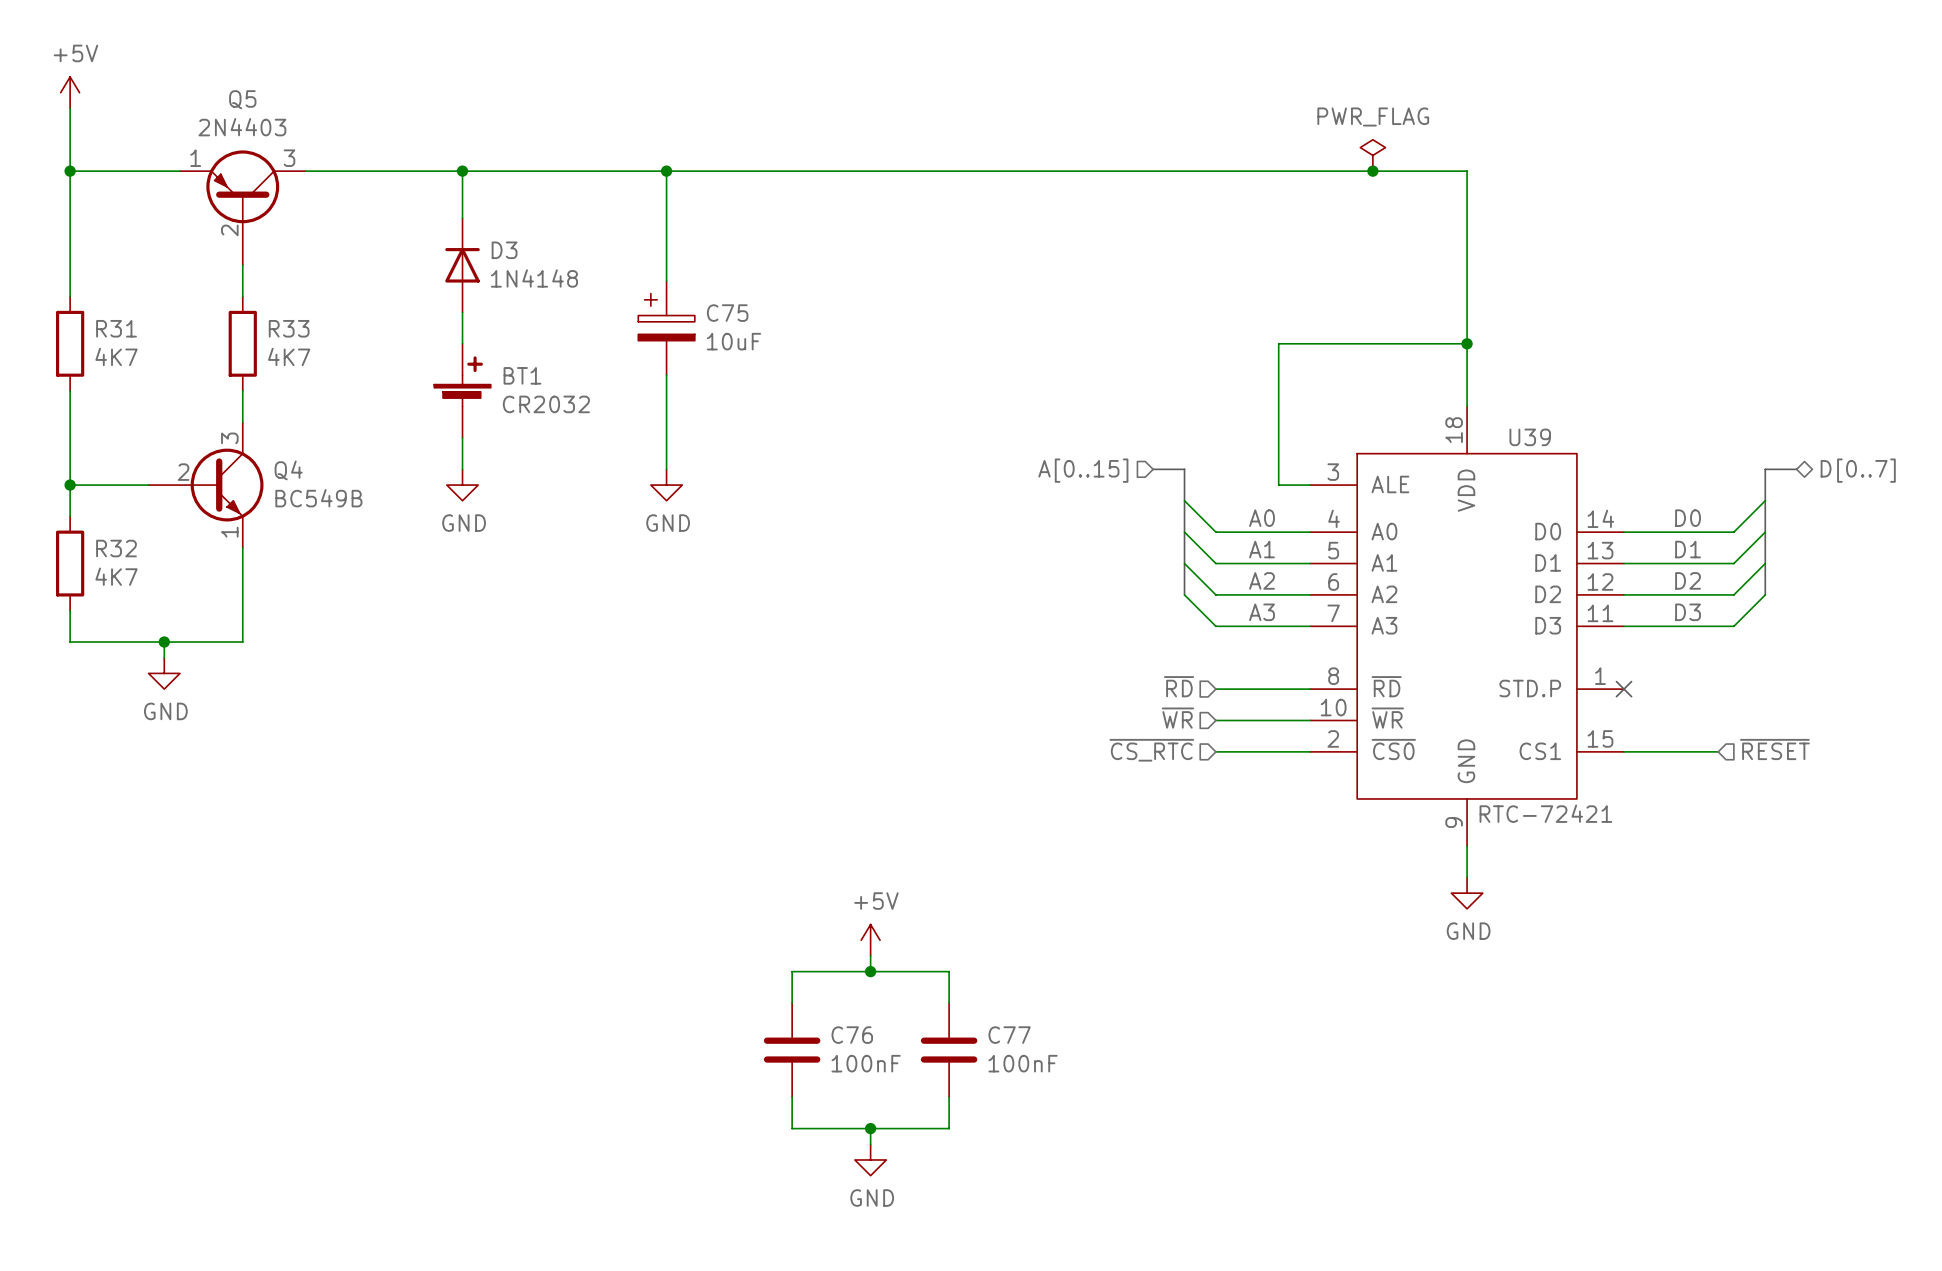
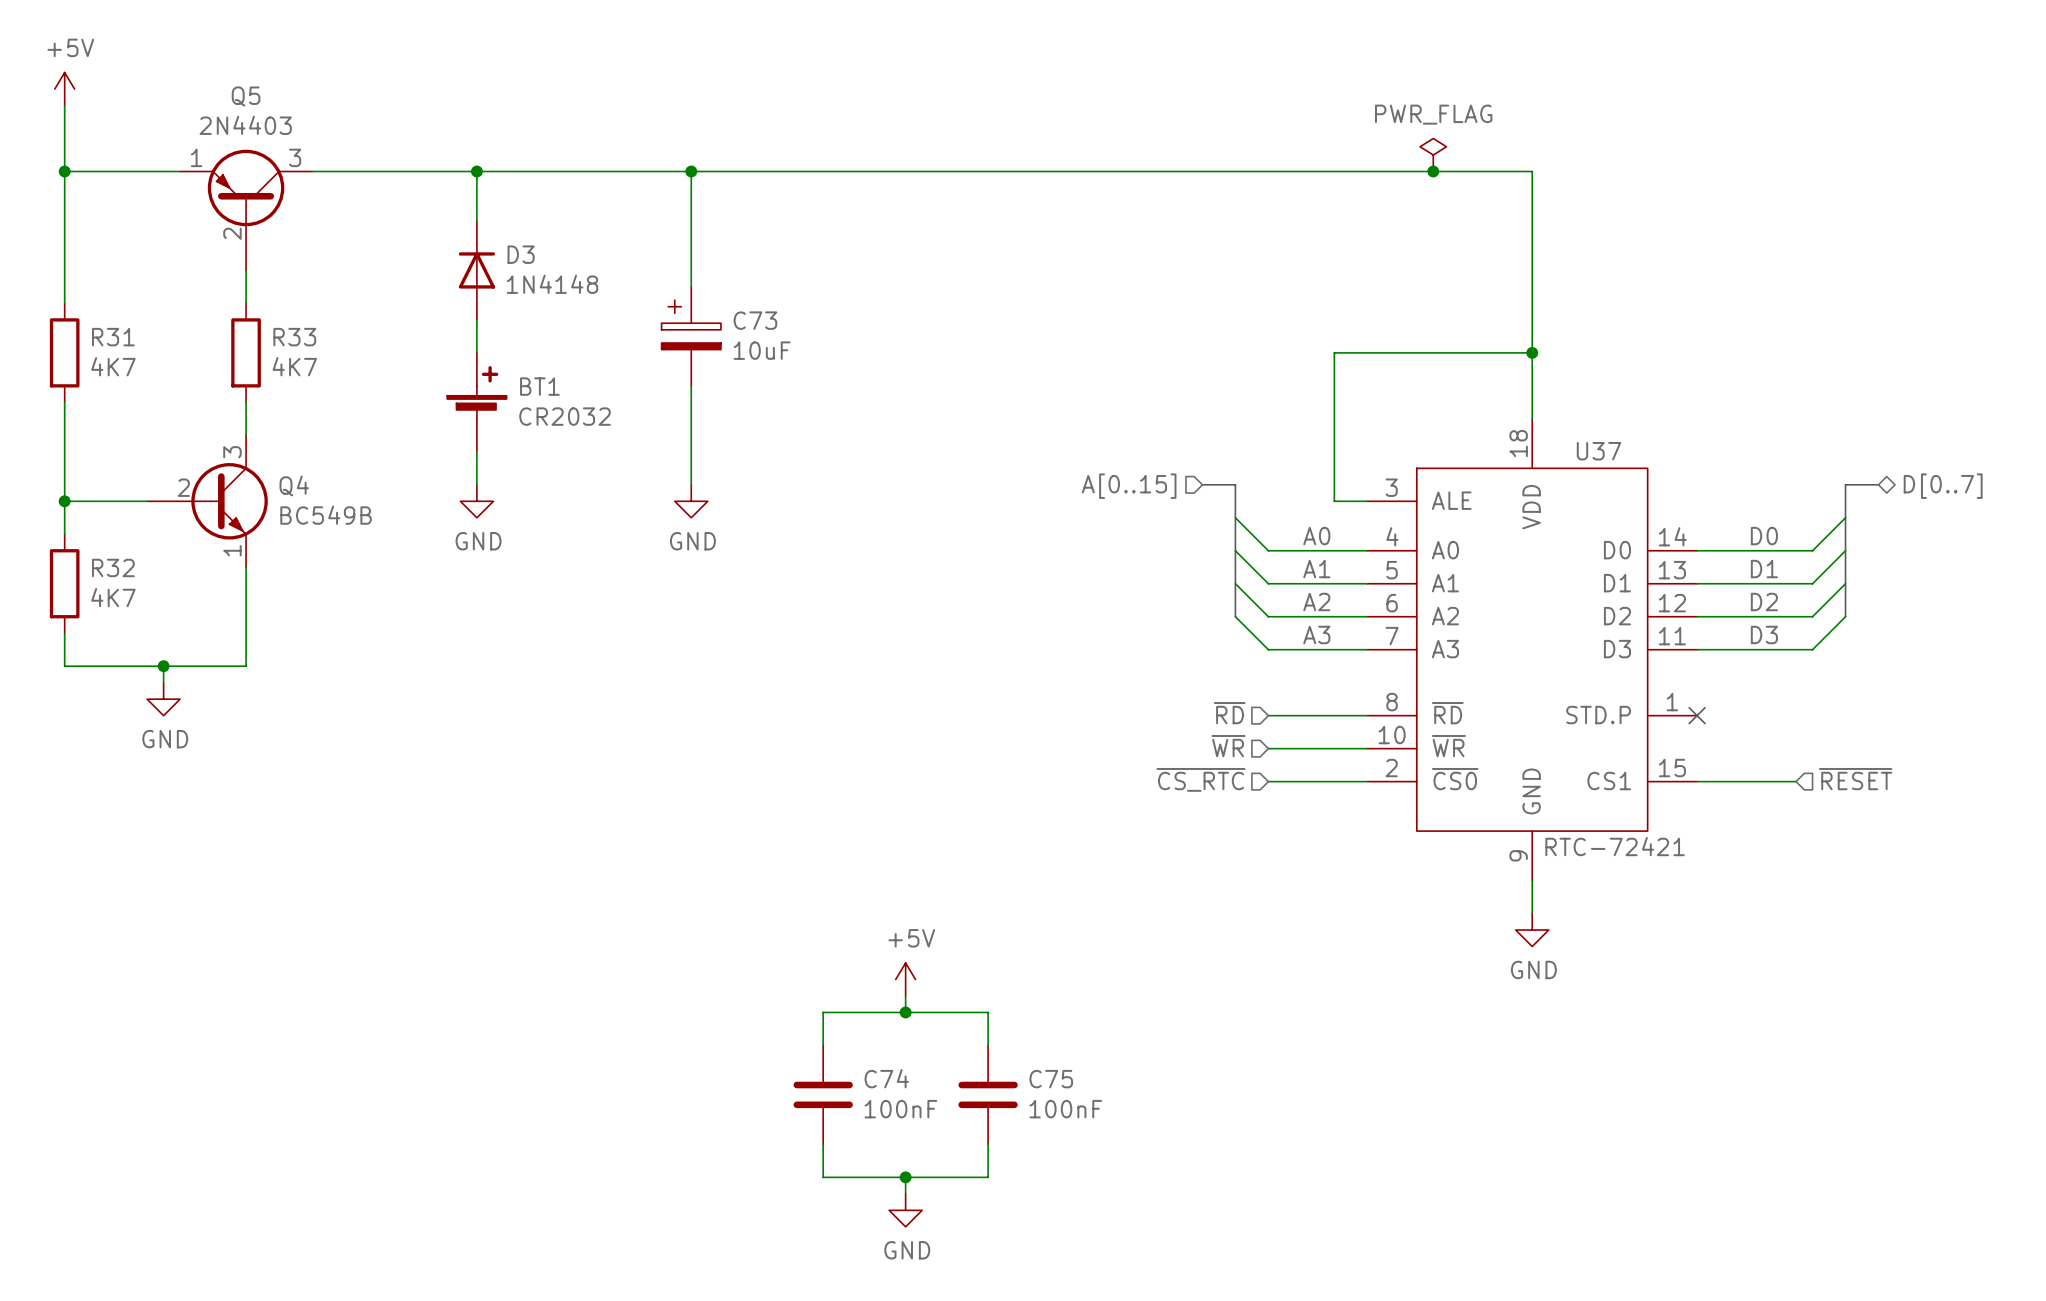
C75 name: C75 (727, 313) -> C73 (755, 320)
U39 name: U39 (1530, 437) -> U37 (1598, 451)
C76 name: C76 (852, 1035) -> C74 (886, 1078)
C77 name: C77 (1009, 1035) -> C75 (1051, 1079)

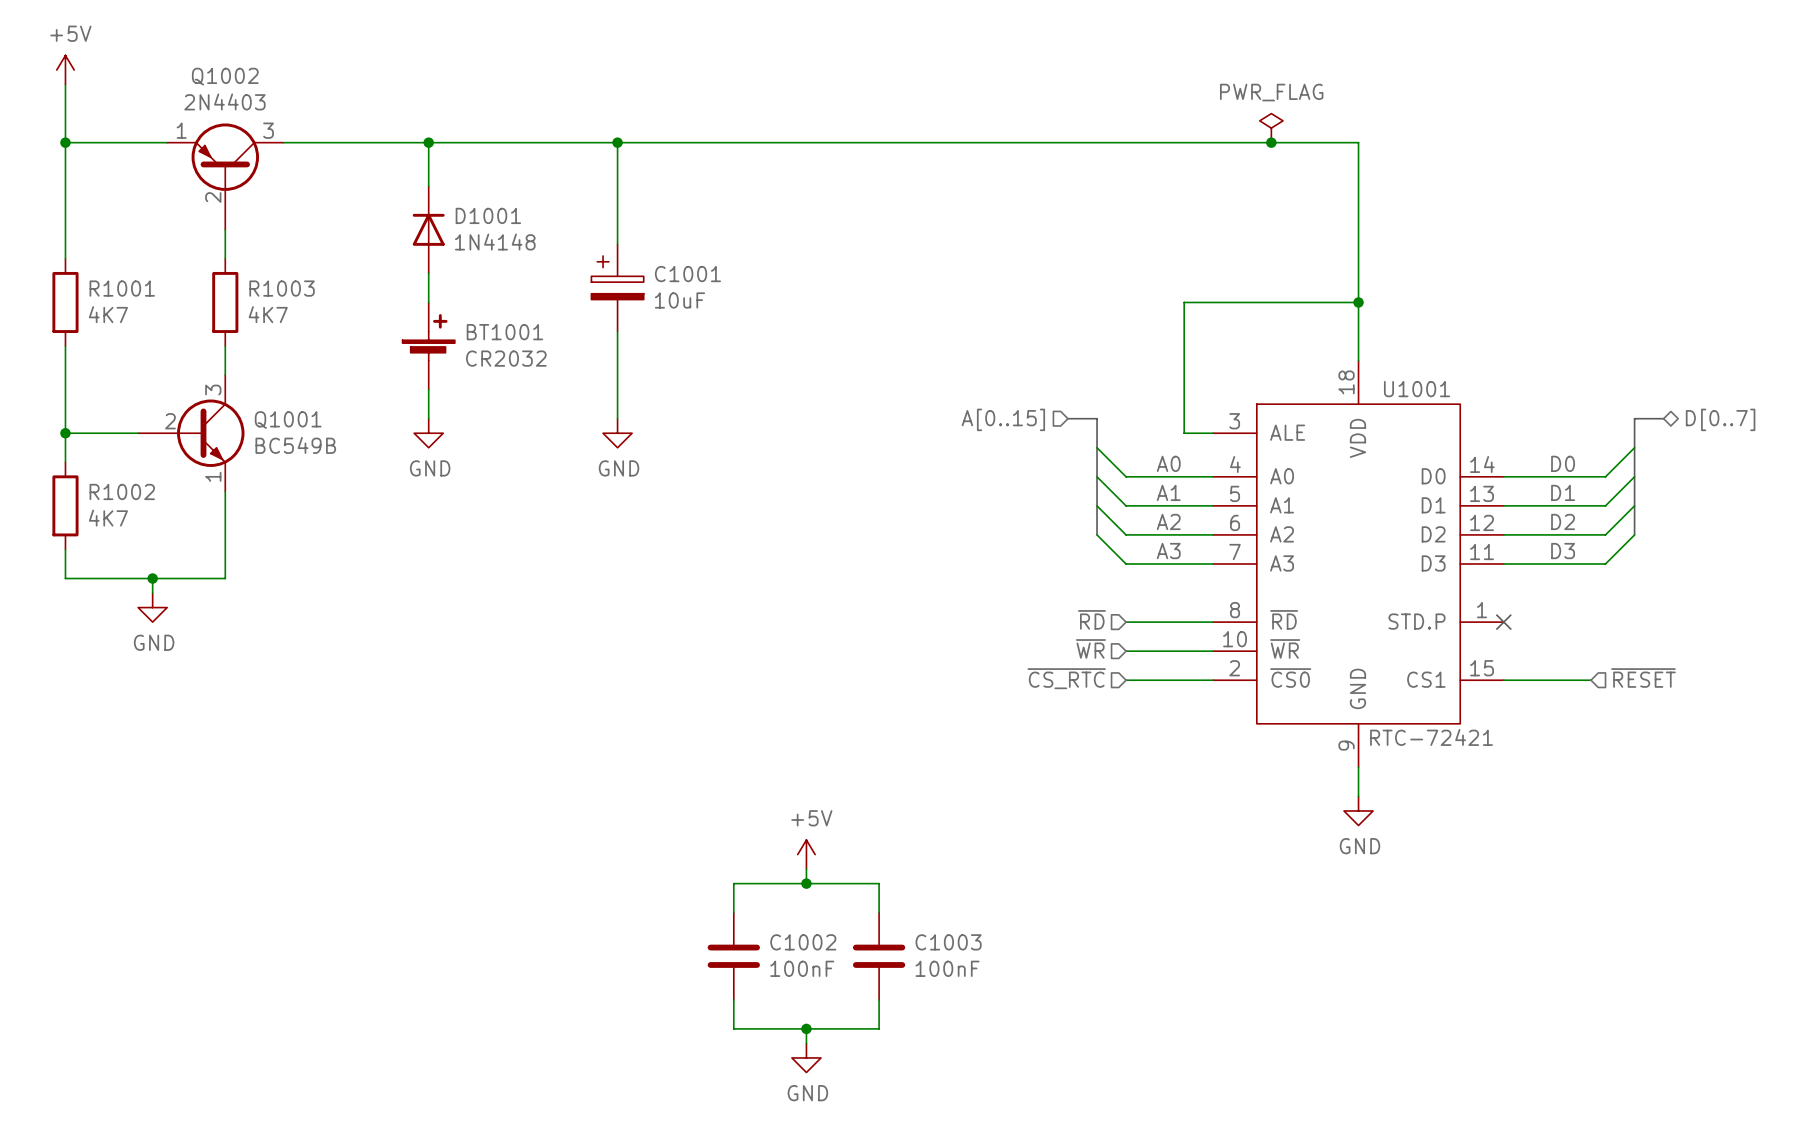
Q5 name: Q5 (246, 96) -> Q1002 (225, 76)
D3 name: D3 (521, 254) -> D1001 (488, 215)
C73 name: C73 (755, 320) -> C1001 (687, 274)
R31 name: R31 (113, 337) -> R1001 (122, 288)
R33 name: R33 (294, 337) -> R1003 (282, 288)
BT1 name: BT1 (539, 386) -> BT1001 (504, 332)
U37 name: U37 (1598, 451) -> U1001 (1416, 389)
Q4 name: Q4 (294, 485) -> Q1001 (288, 420)
R32 name: R32 (113, 567) -> R1002 (122, 491)
C74 name: C74 (886, 1078) -> C1002 (803, 942)
C75 name: C75 (1051, 1079) -> C1003 (948, 942)

